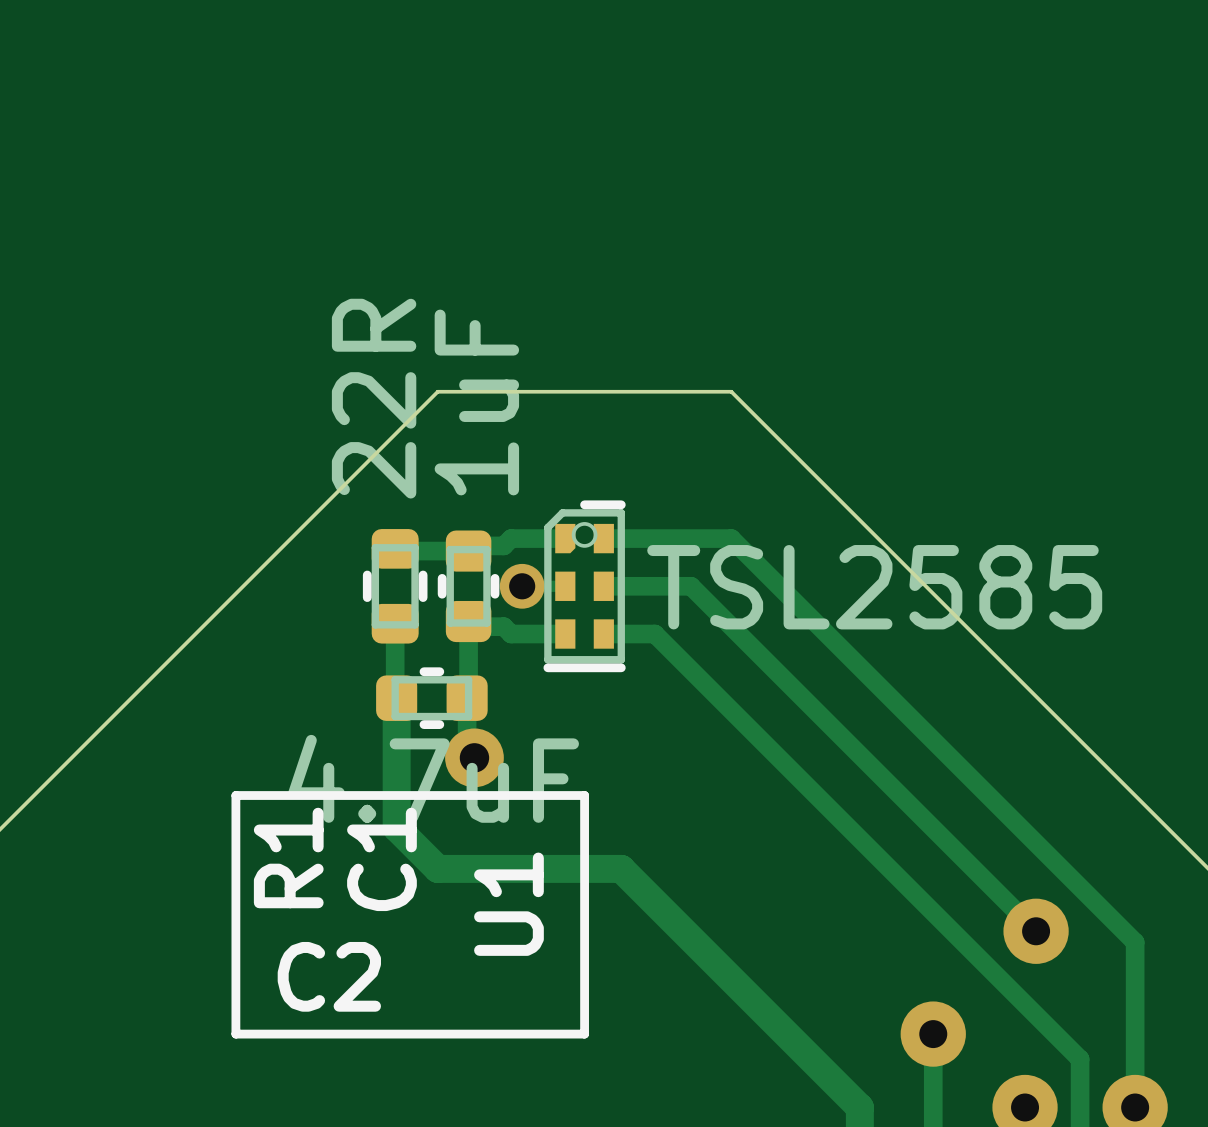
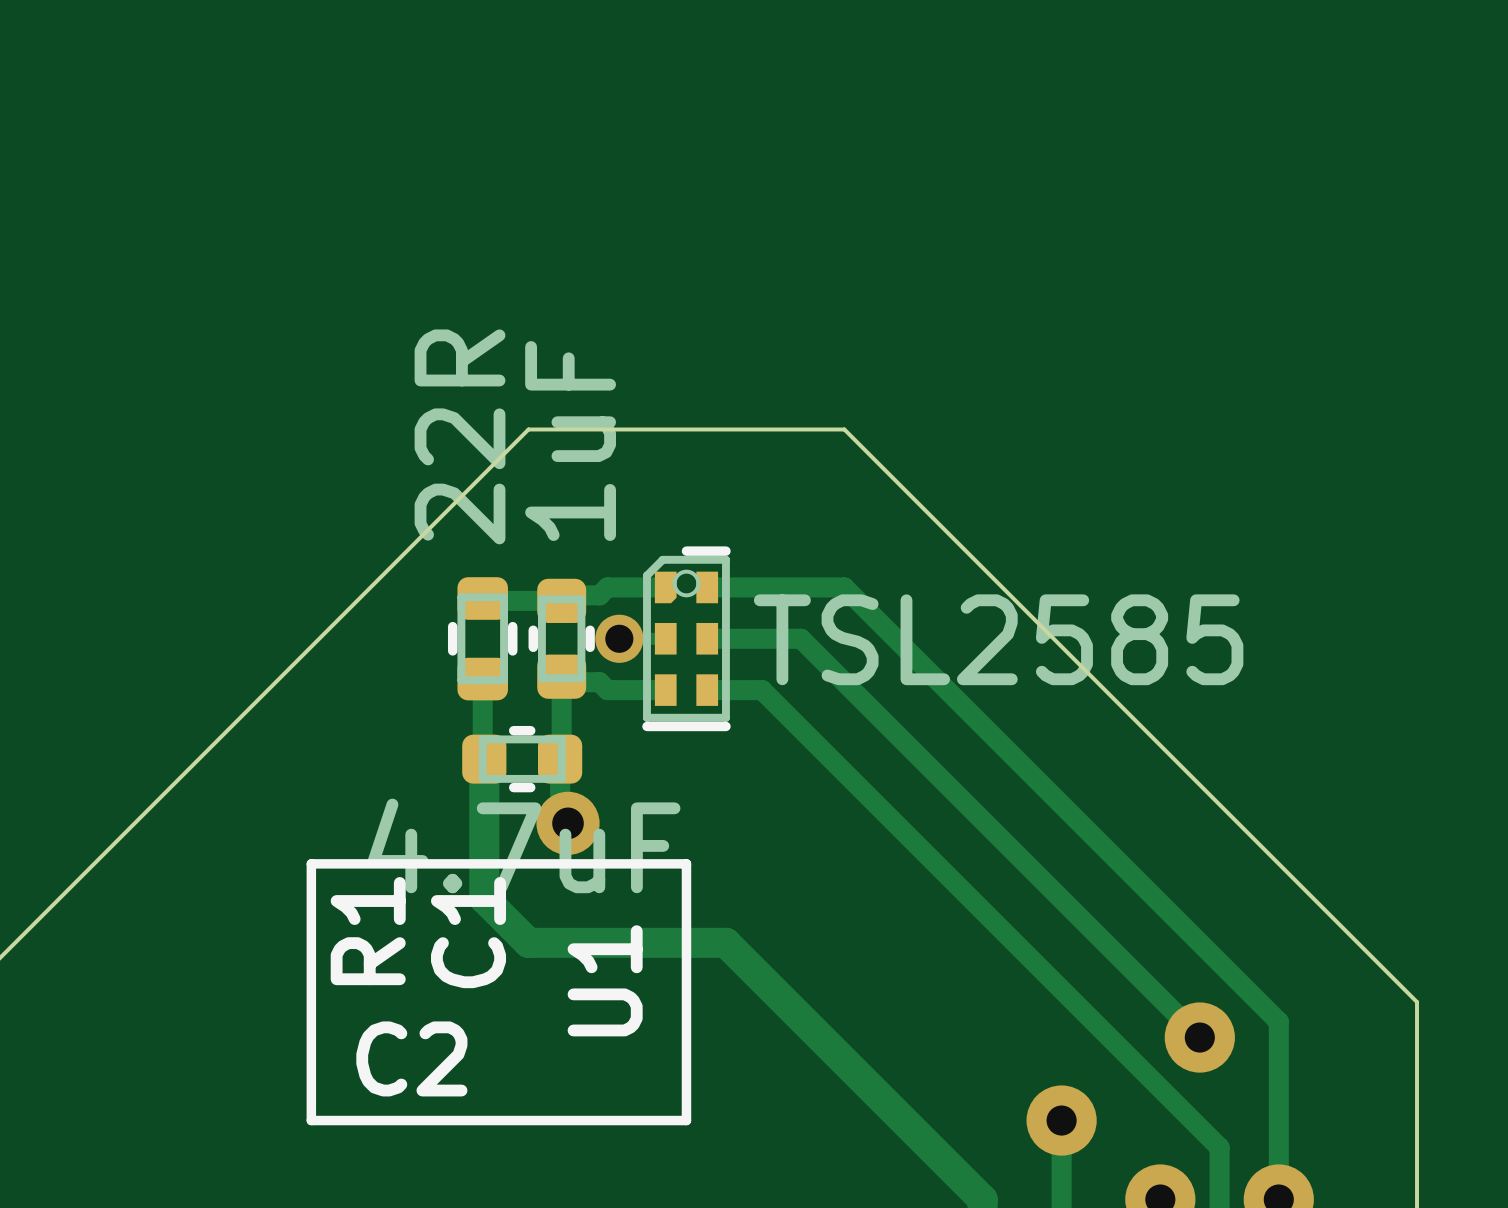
via position: (1036, 931) -> (1199, 1037)

